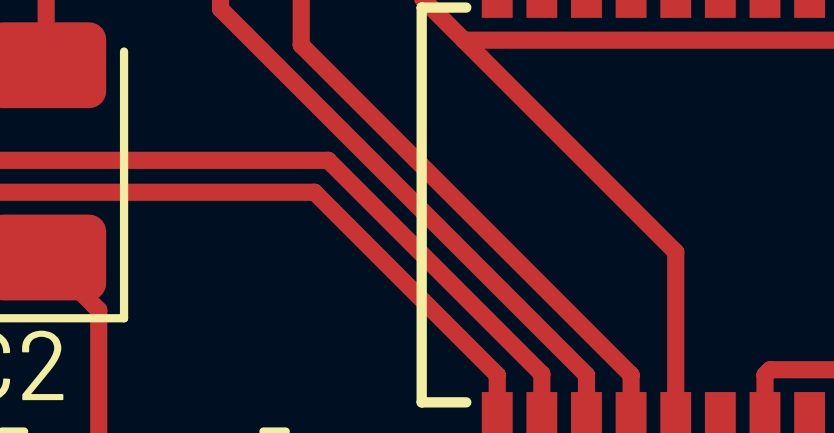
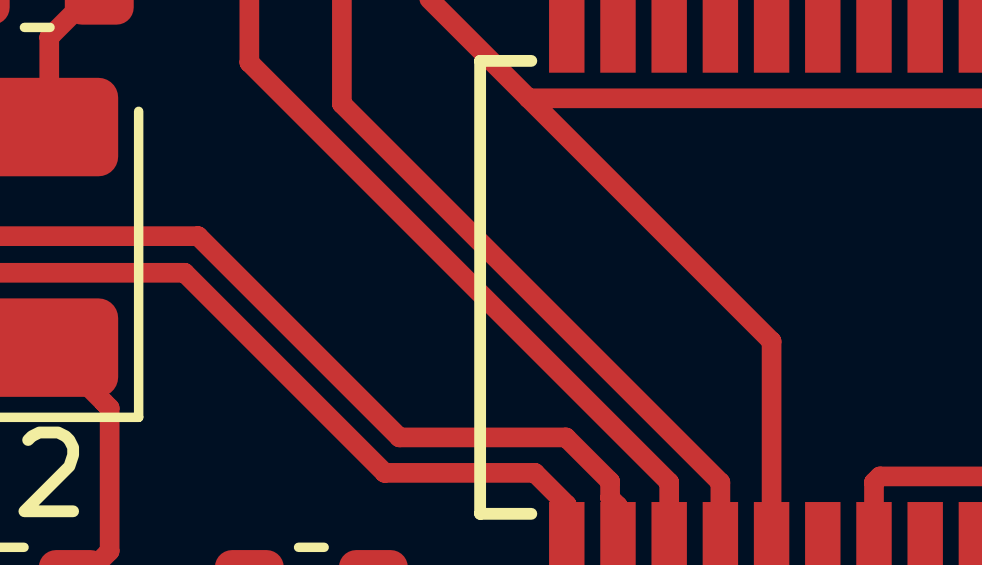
track: (175, 160) (328, 160) (541, 373) (541, 395) -> (198, 236) (399, 437) (565, 437) (610, 481) (610, 498) (617, 505)
track: (164, 192) (314, 192) (497, 374) (497, 394) -> (184, 272) (384, 472) (534, 472) (566, 504)

